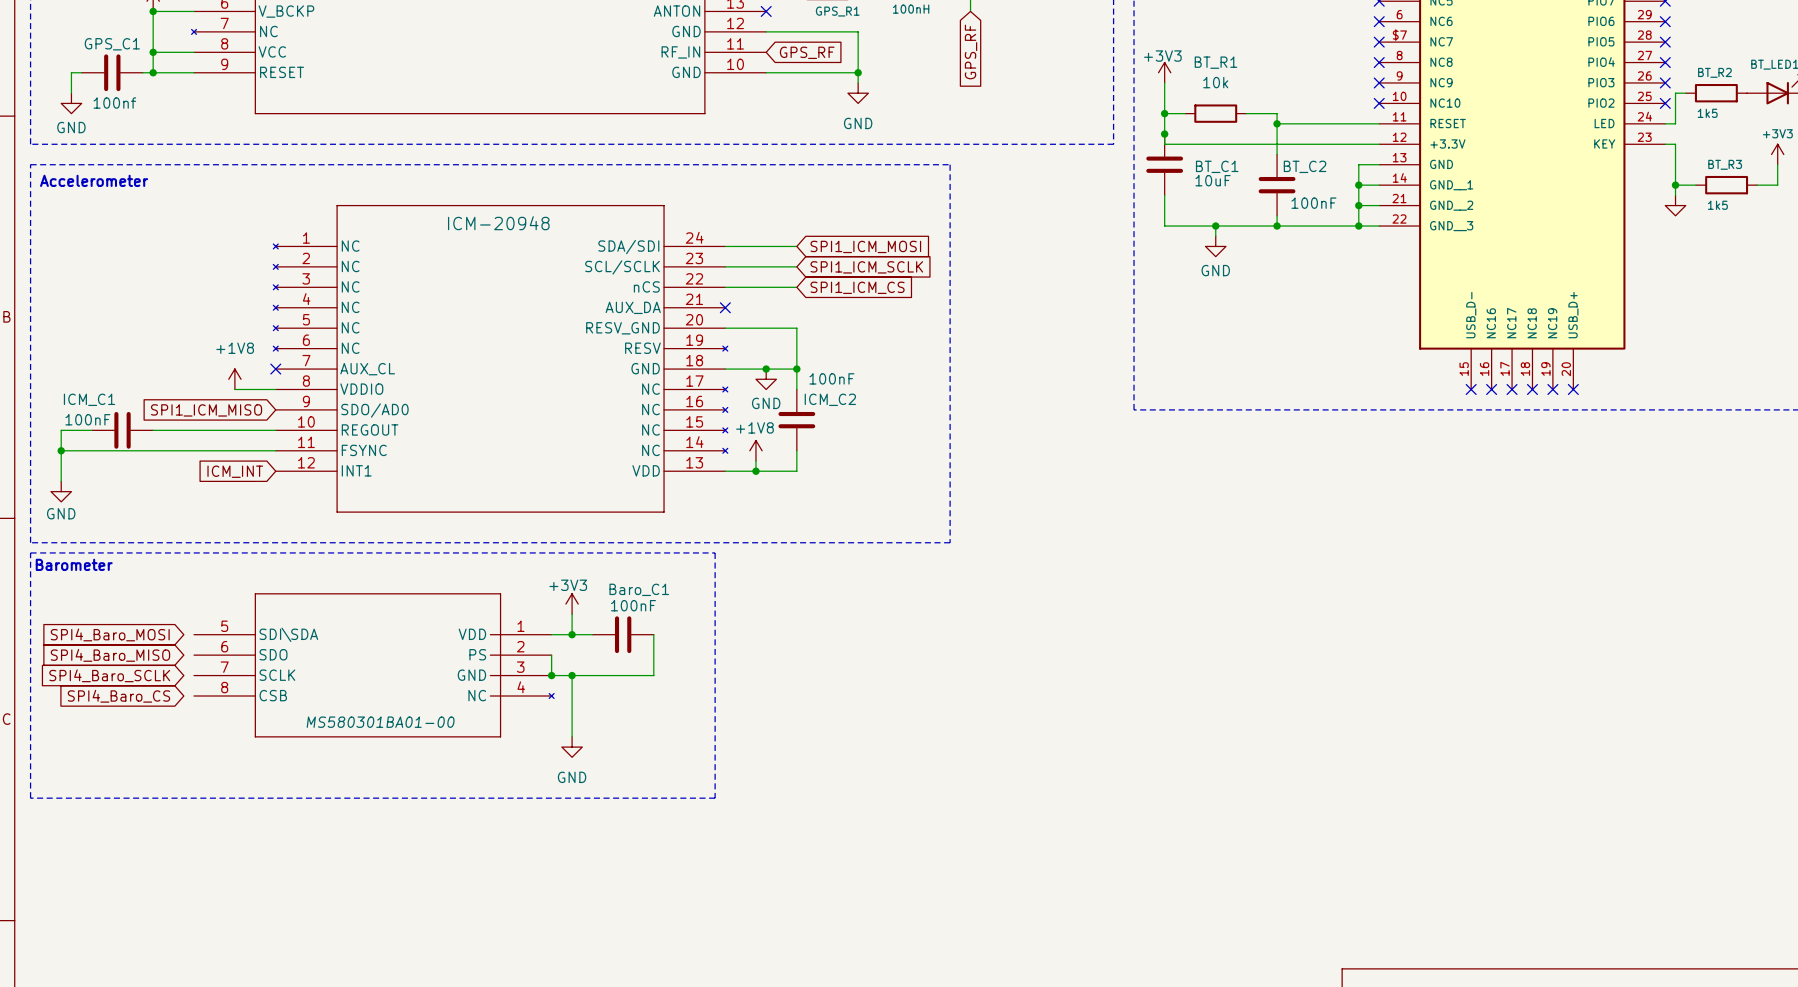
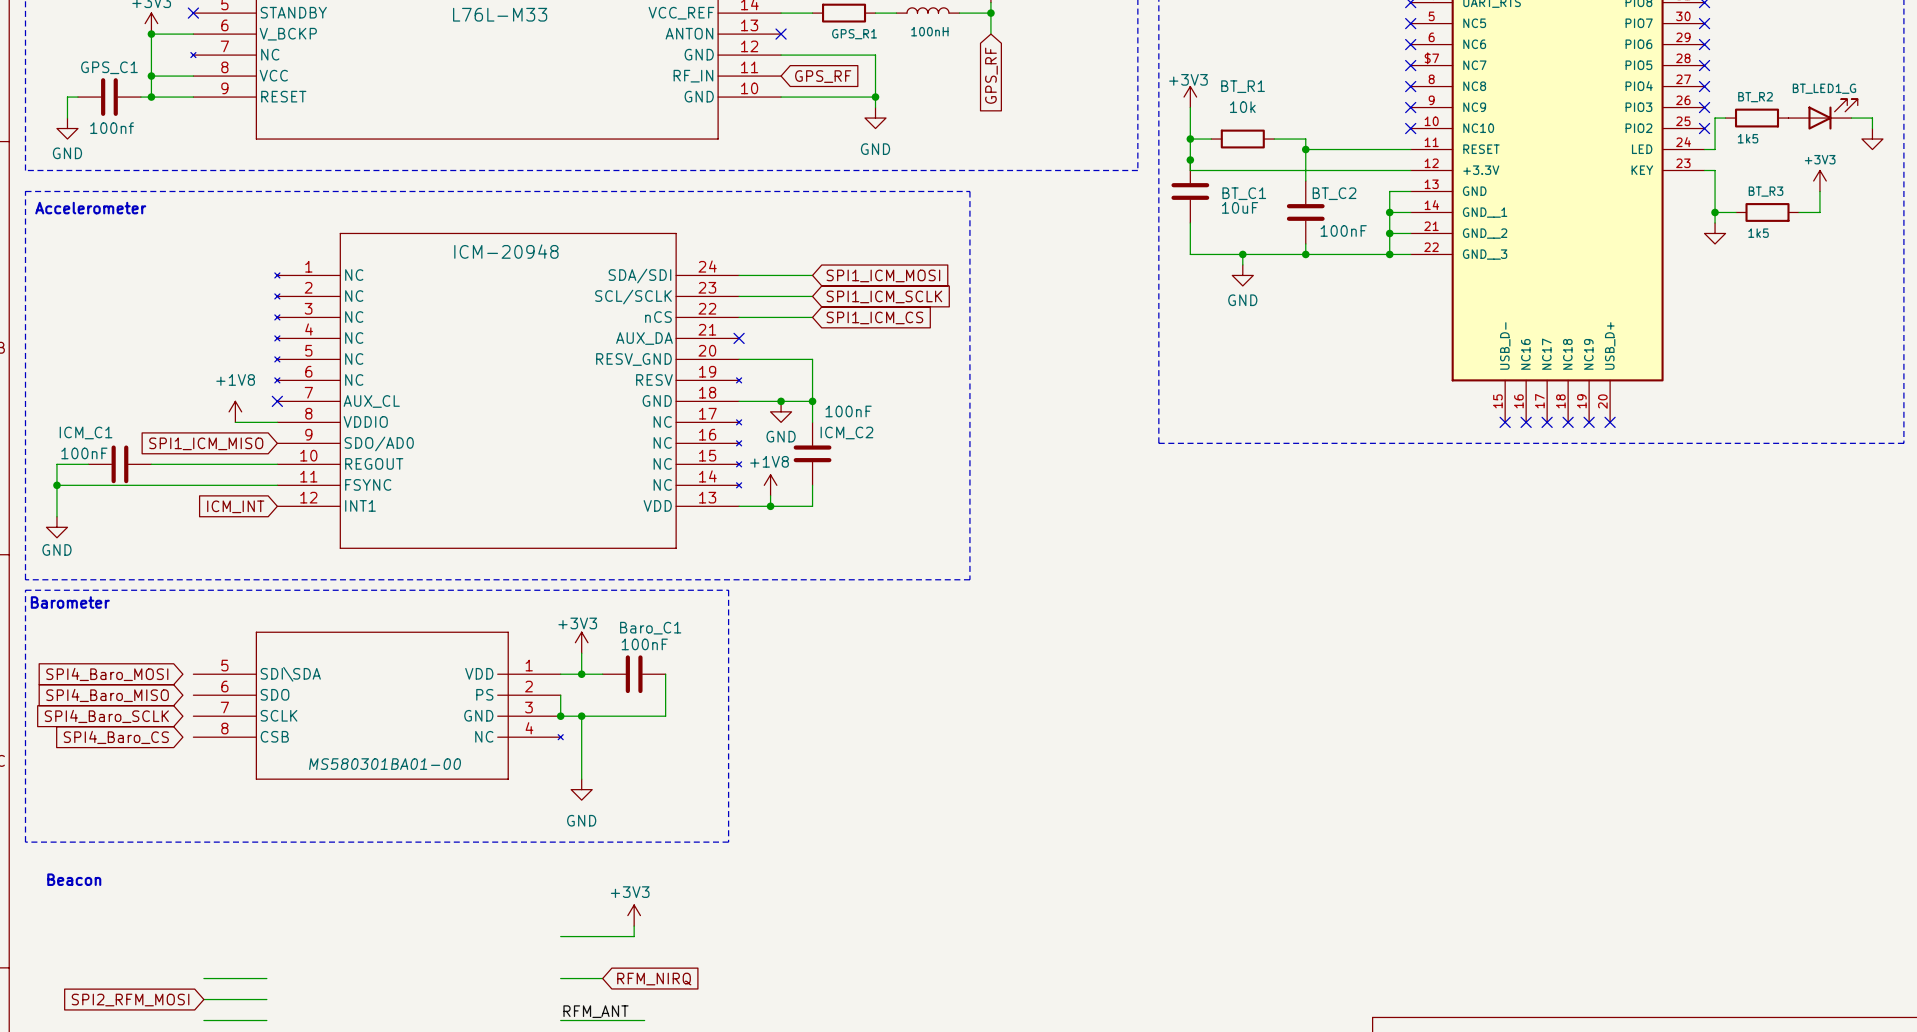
text: none -> Beacon (74, 879)
power symbol: none -> +3V3 (634, 915)
wire: none -> (634, 926) (634, 936) (560, 936)
wire: none -> (203, 978) (266, 978)
wire: none -> (560, 978) (602, 978)
global label: none -> RFM_NIRQ (654, 979)
global label: none -> SPI2_RFM_MOSI (130, 1000)
wire: none -> (203, 999) (266, 999)
label: none -> RFM_ANT (596, 1011)
wire: none -> (203, 1020) (266, 1020)
wire: none -> (560, 1020) (644, 1020)

